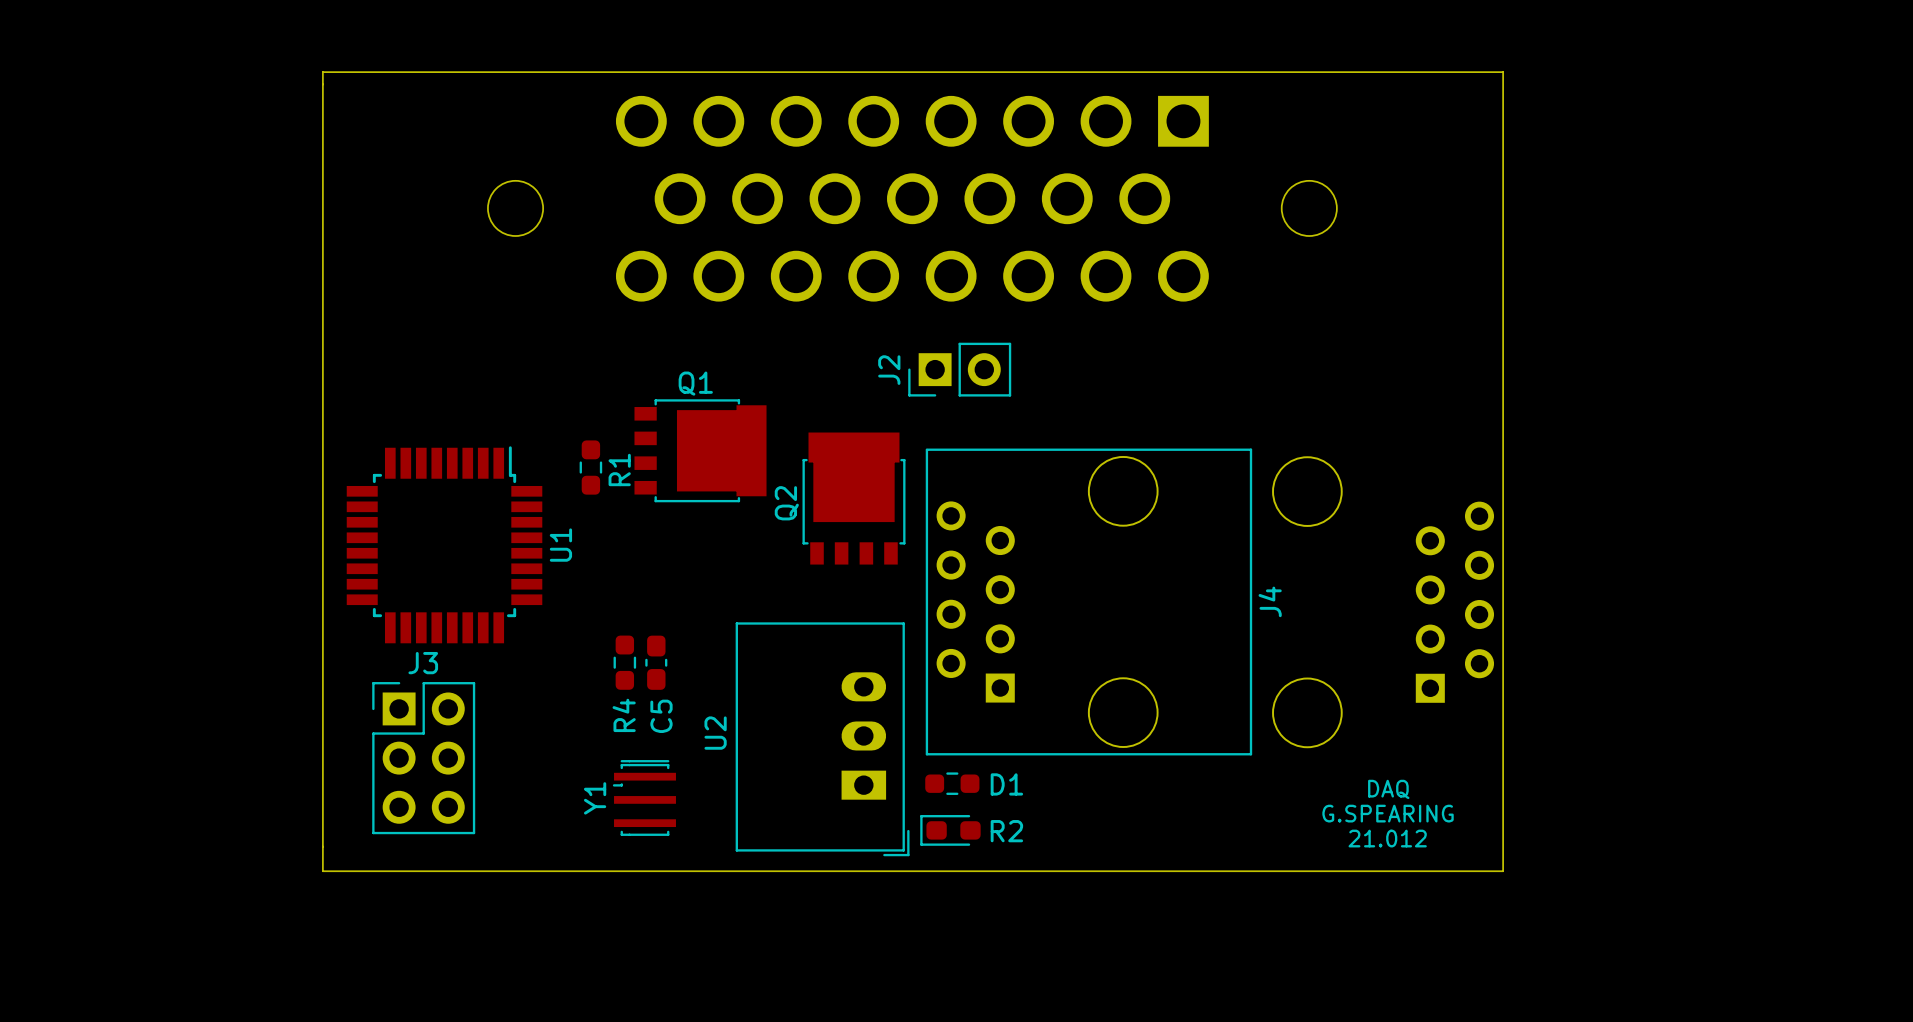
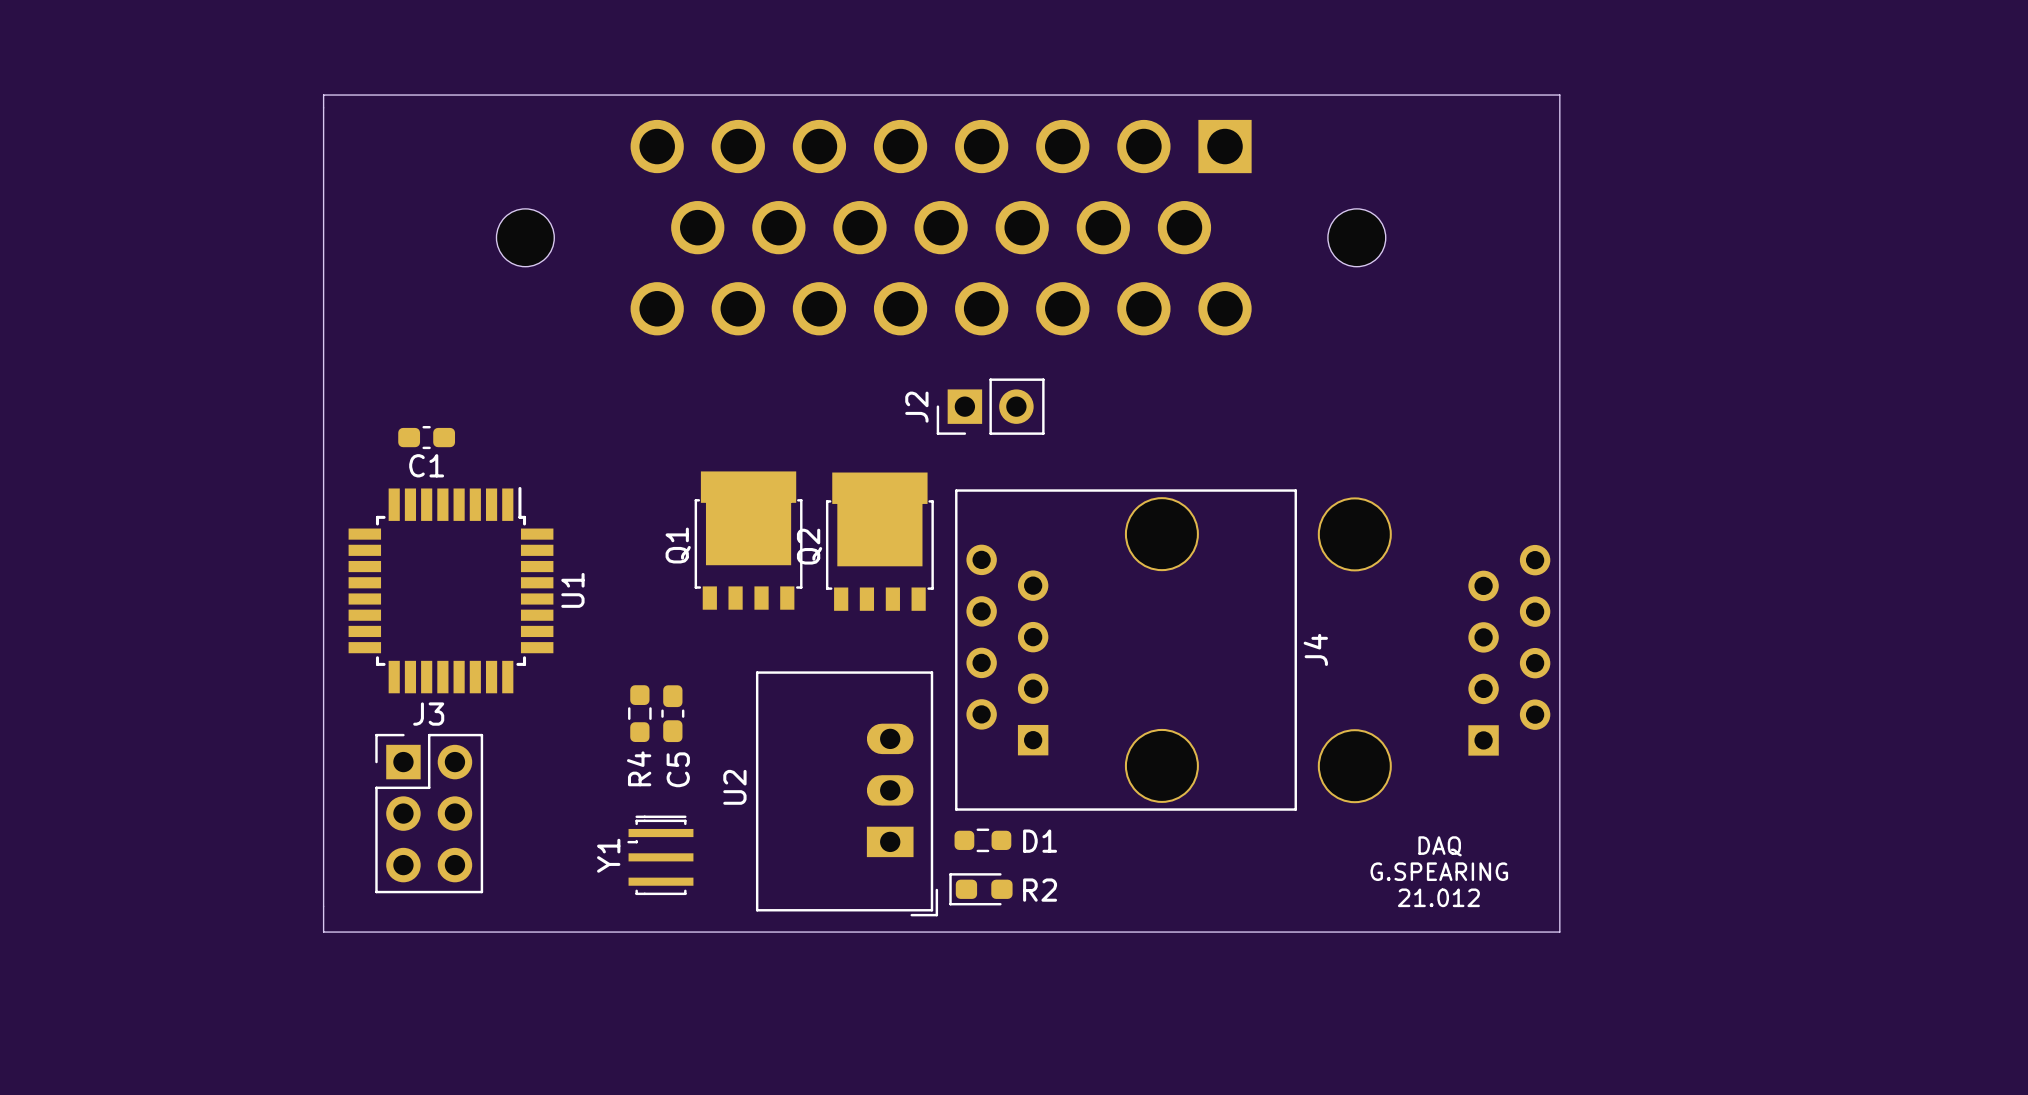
C1: none -> (426, 437)
Q1 rotation: 0° (700, 450) -> 90° counterclockwise (748, 540)
R1: (590, 467) -> none

